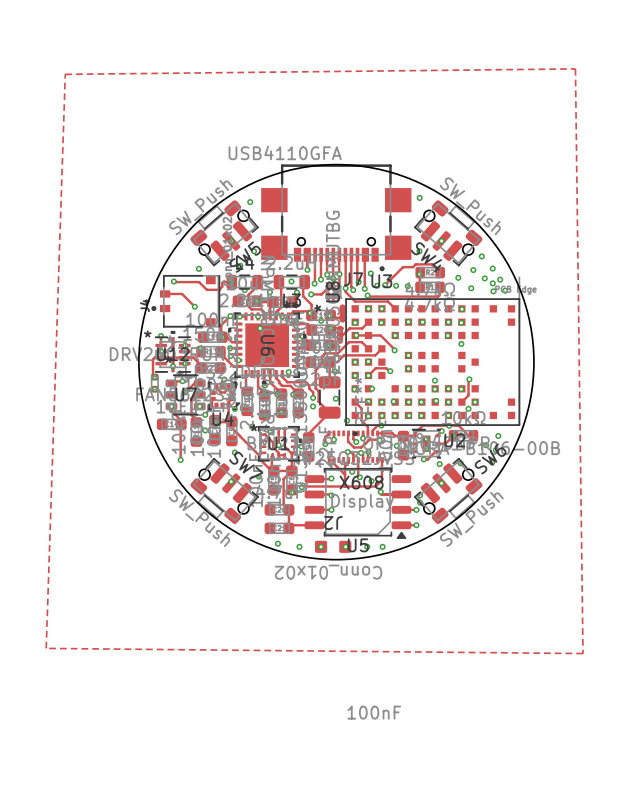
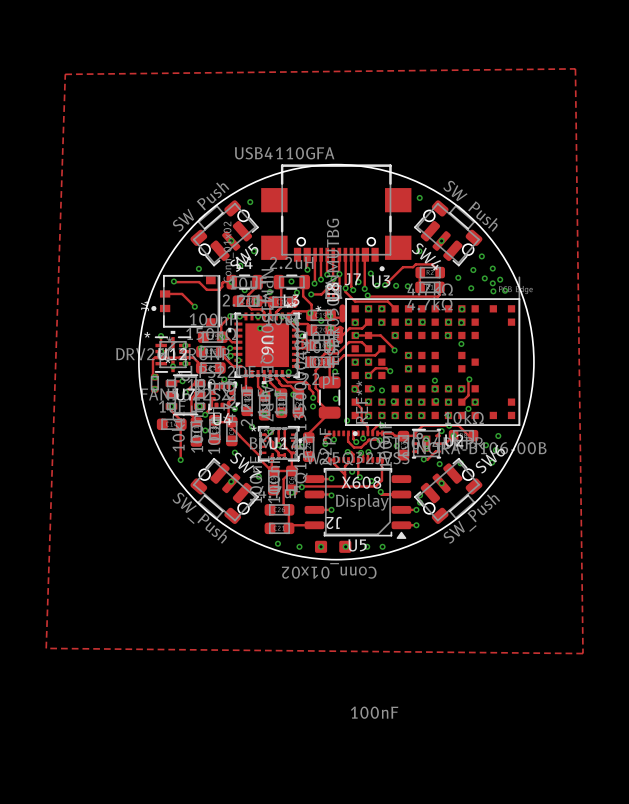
via: (419, 274) -> none
via position: (355, 375) -> (381, 390)
track: (216, 386) (220, 392) (224, 392) (228, 386) -> none

